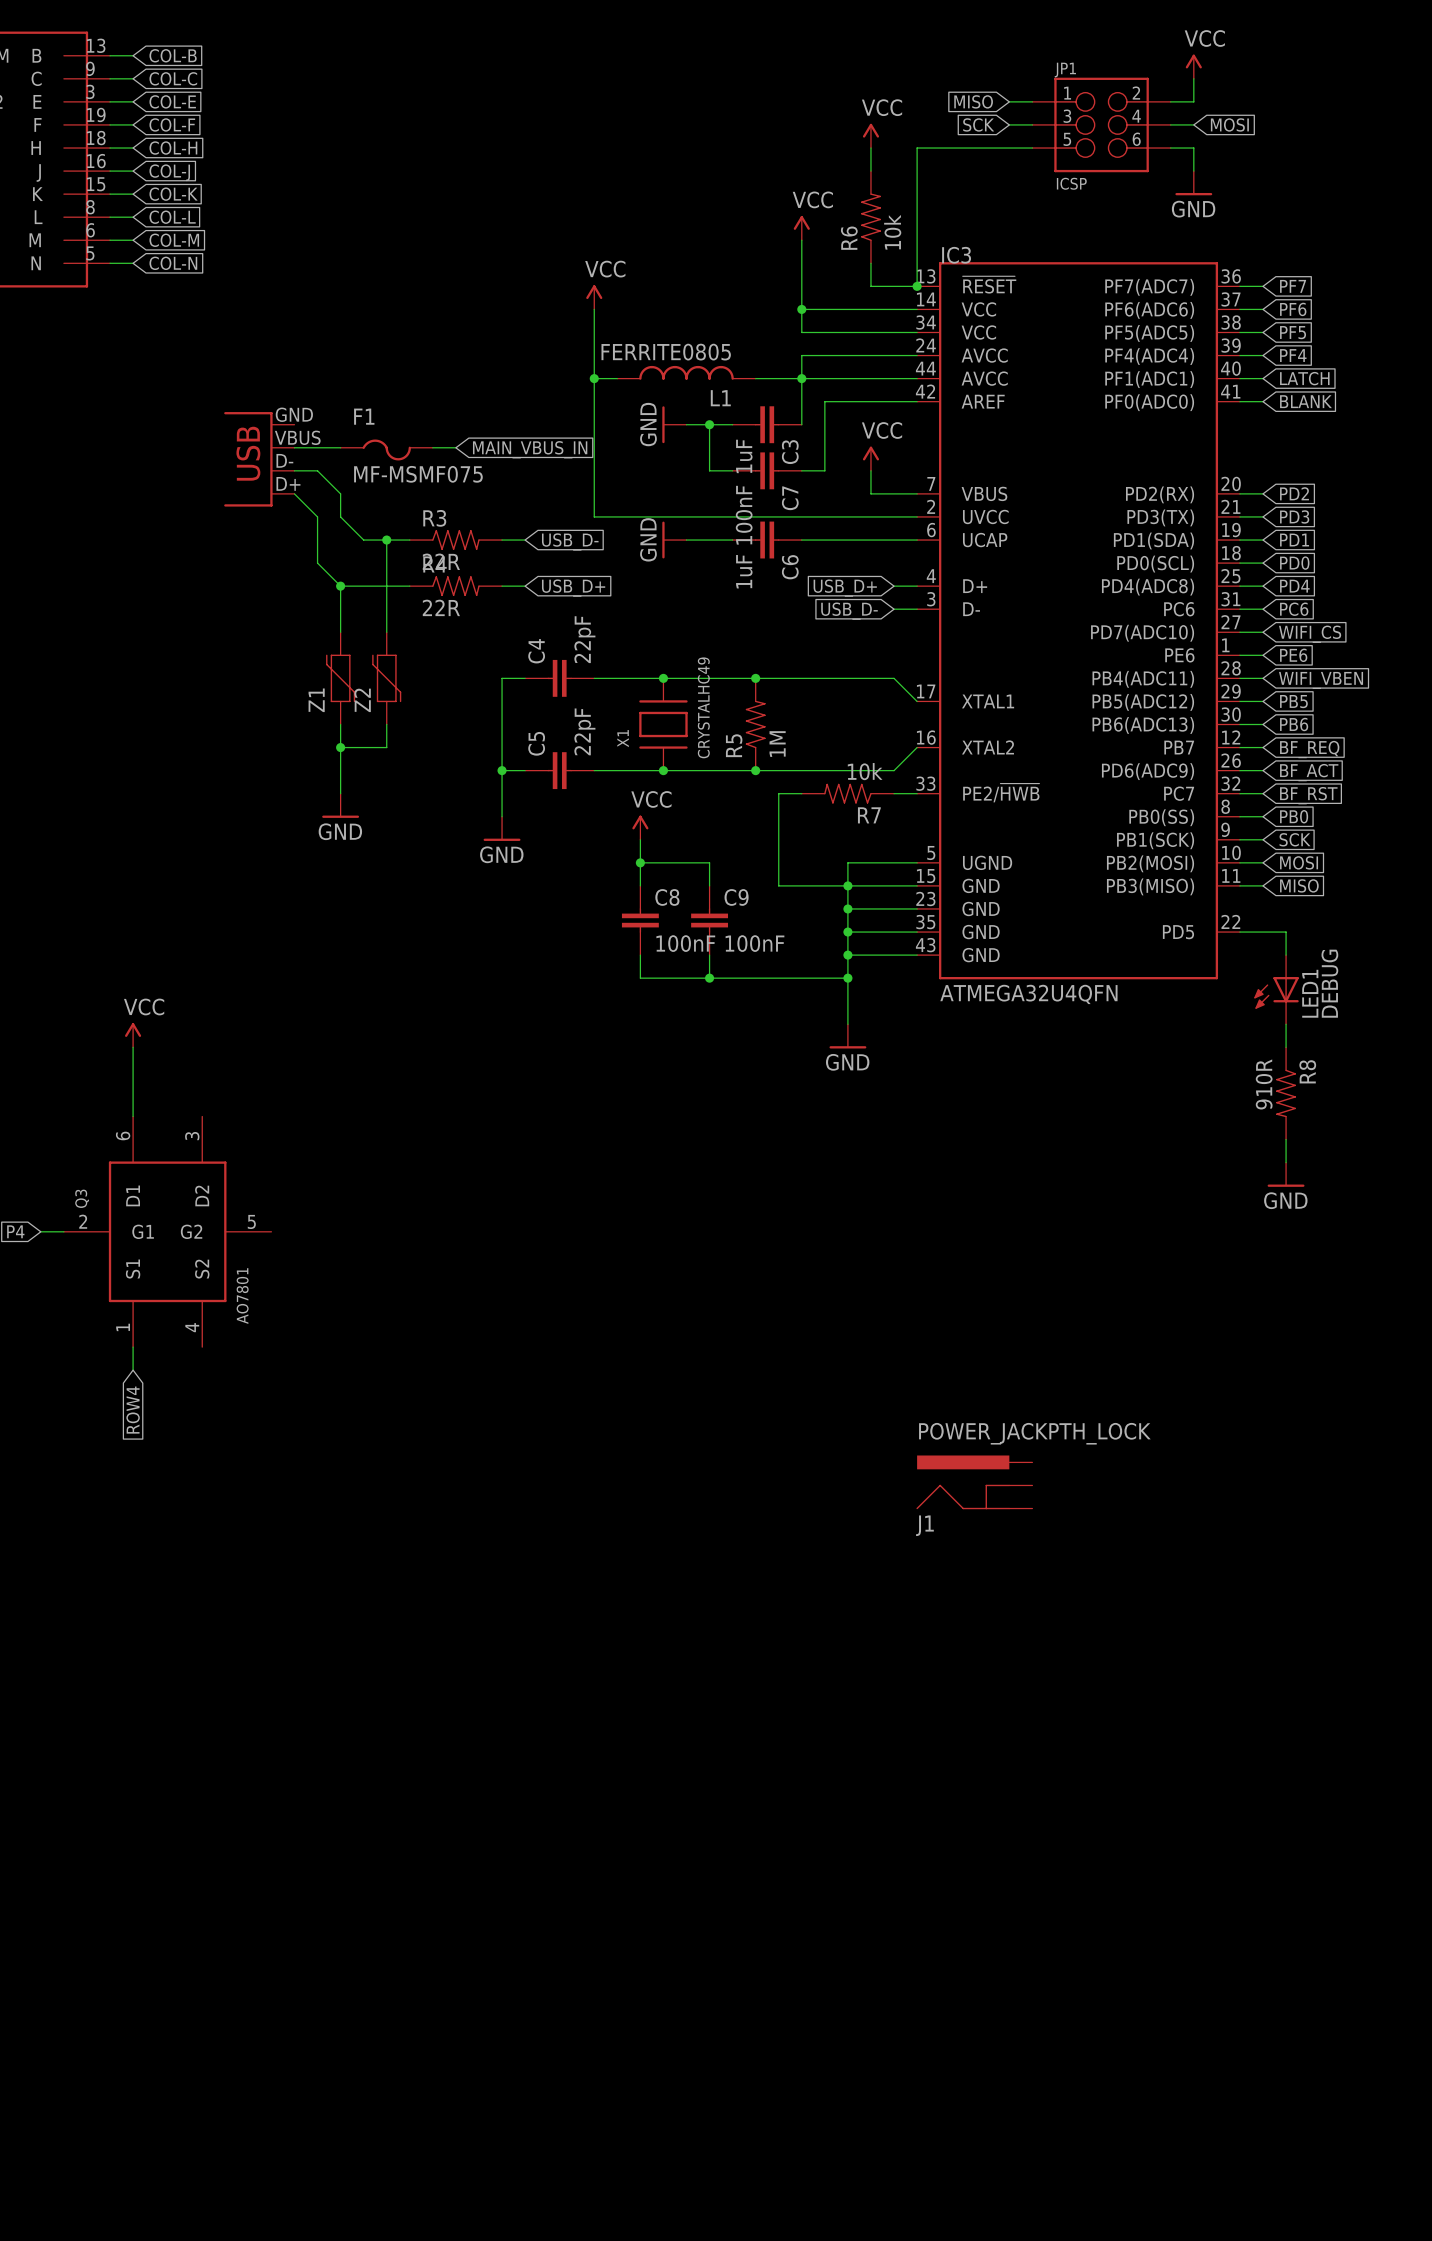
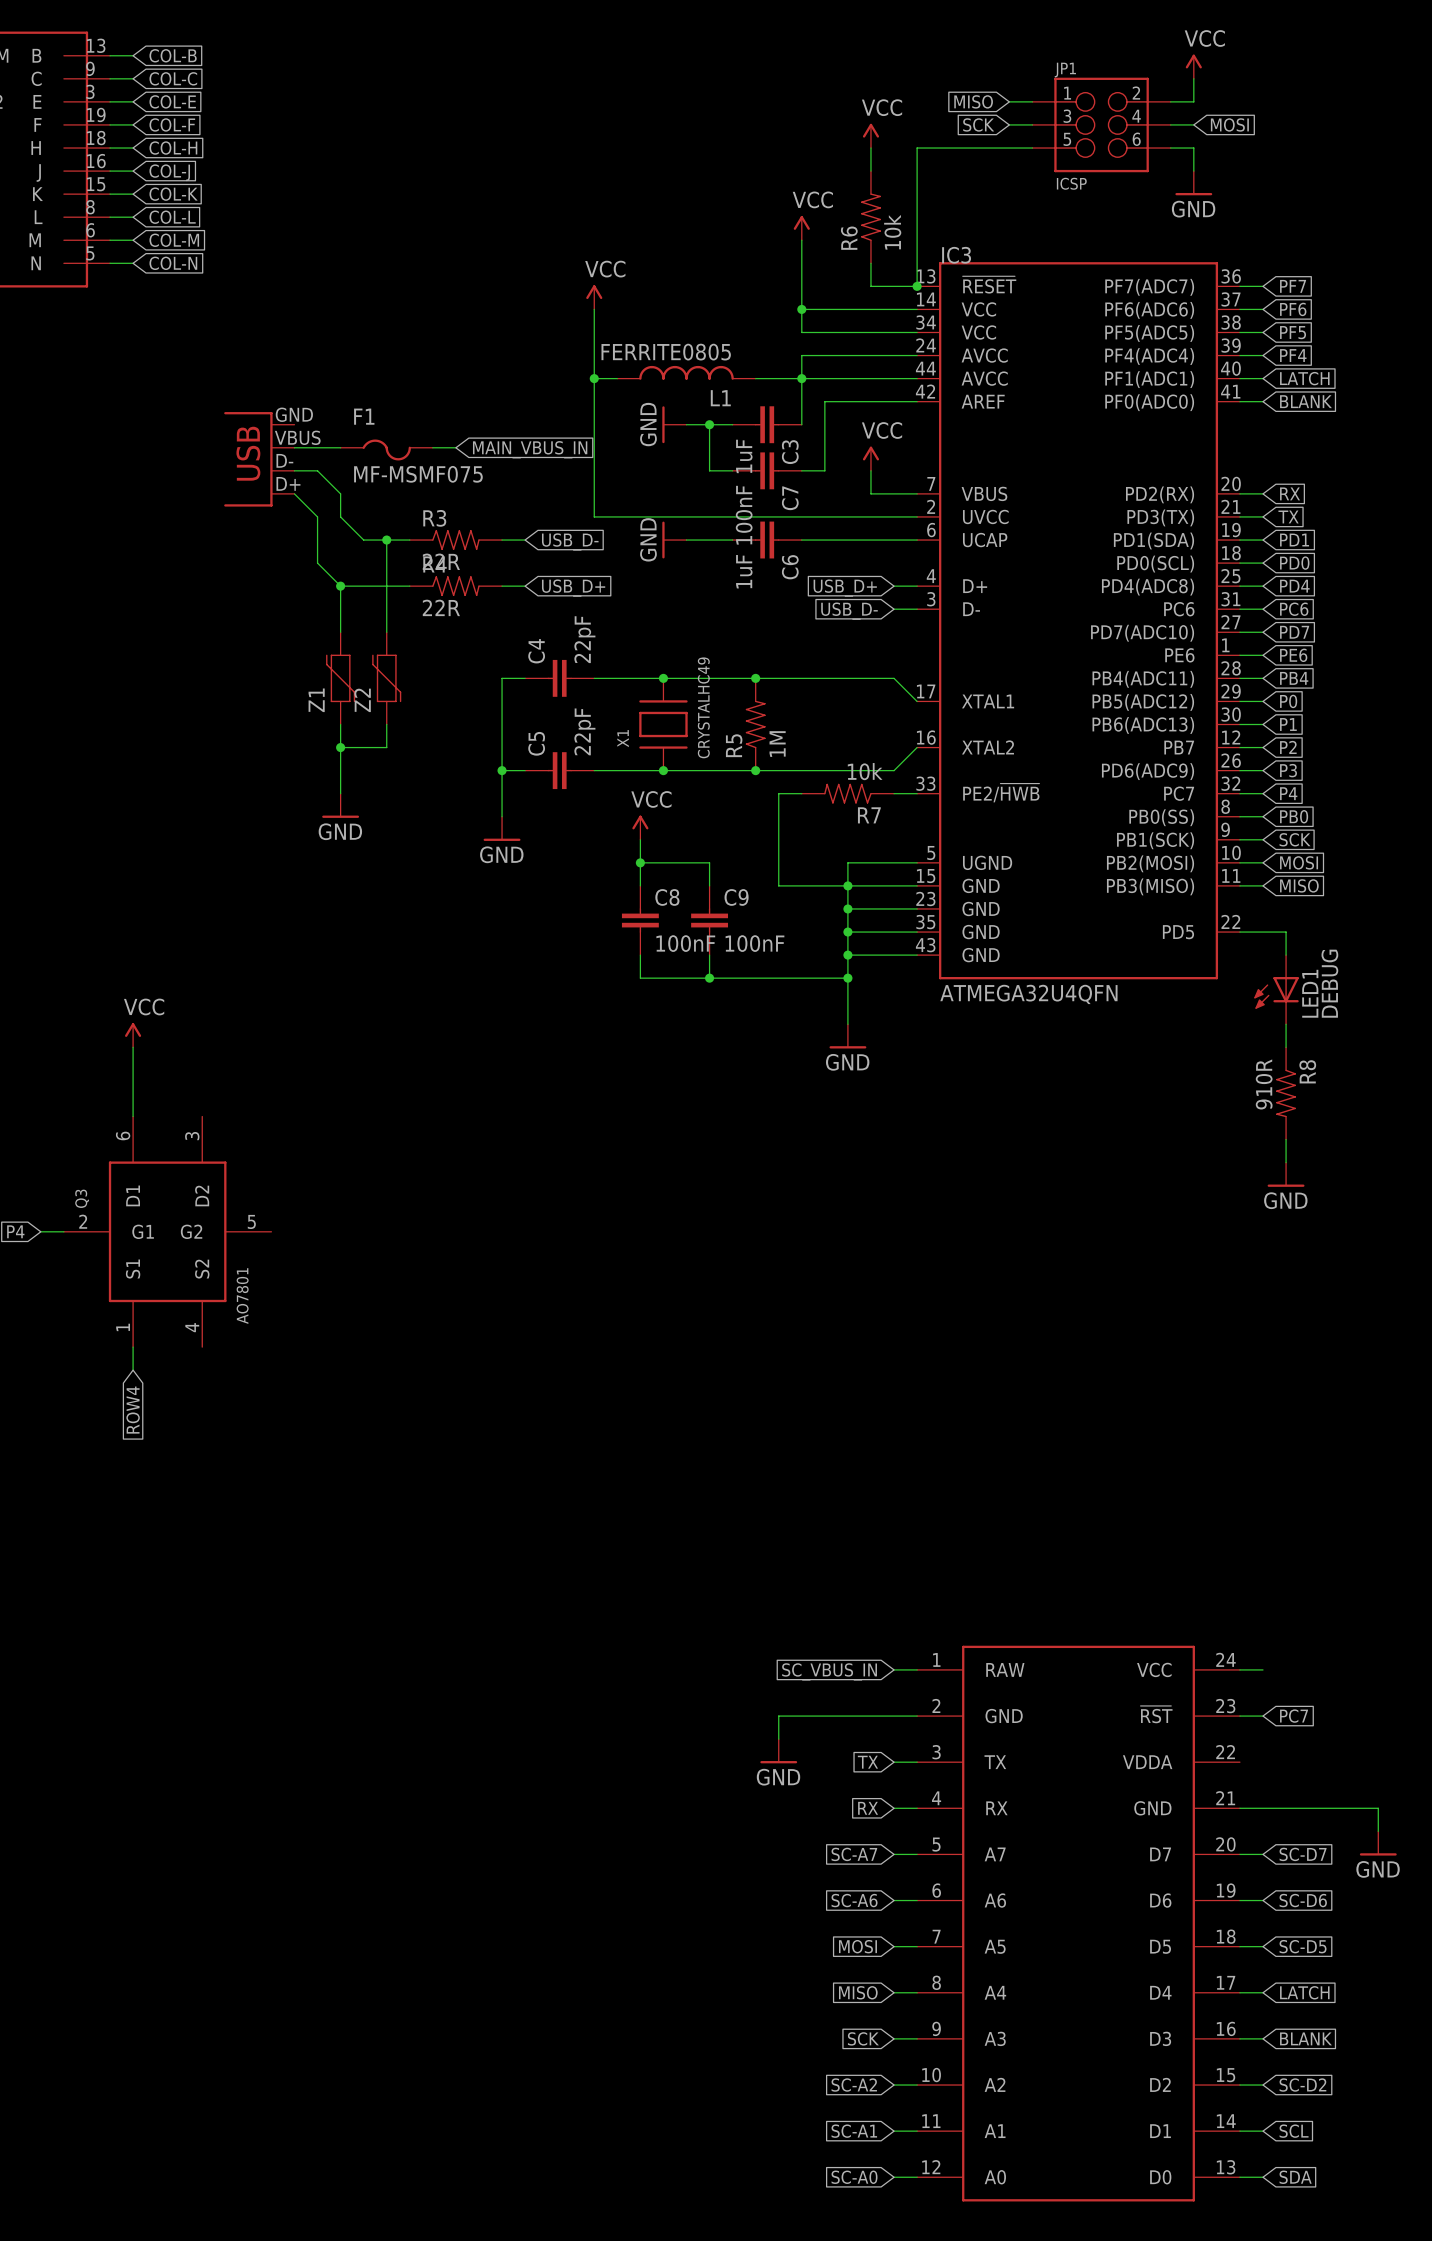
global label: PD2 (1294, 493) -> RX (1290, 493)
global label: PD3 (1294, 516) -> TX (1288, 516)
global label: WIFI_CS (1310, 634) -> PD7 (1294, 632)
global label: WIFI_VBEN (1321, 680) -> PB4 (1294, 678)
global label: PB5 (1293, 701) -> P0 (1288, 701)
global label: PB6 (1294, 724) -> P1 (1288, 724)
global label: BF_REQ (1309, 749) -> P2 (1288, 747)
global label: BF_ACT (1309, 772) -> P3 (1288, 770)
global label: BF_RST (1308, 795) -> P4 (1288, 793)
J1: POWER_JACKPTH_LOCK (974, 1482) -> none
wire: none -> (894, 1669) (917, 1669)
wire: none -> (1239, 1669) (1262, 1669)
global label: none -> SC_VBUS_IN (829, 1671)
wire: none -> (917, 1716) (778, 1716) (778, 1739)
wire: none -> (1239, 1716) (1262, 1716)
global label: none -> PC7 (1294, 1716)
power symbol: none -> GND (778, 1751)
global label: none -> TX (867, 1762)
wire: none -> (894, 1762) (917, 1762)
global label: none -> RX (868, 1808)
wire: none -> (894, 1808) (917, 1808)
wire: none -> (1239, 1808) (1378, 1808) (1378, 1831)
power symbol: none -> GND (1378, 1843)
global label: none -> SC-A7 (854, 1854)
wire: none -> (894, 1854) (917, 1854)
wire: none -> (1239, 1854) (1262, 1854)
global label: none -> SC-D7 (1303, 1854)
global label: none -> SC-A6 (854, 1900)
wire: none -> (894, 1900) (917, 1900)
wire: none -> (1239, 1900) (1262, 1900)
global label: none -> SC-D6 (1303, 1900)
part: none -> (1078, 1923)
global label: none -> MOSI (857, 1946)
wire: none -> (894, 1946) (917, 1946)
wire: none -> (1239, 1946) (1262, 1946)
global label: none -> SC-D5 (1303, 1946)
global label: none -> MISO (858, 1992)
wire: none -> (894, 1992) (917, 1992)
wire: none -> (1239, 1992) (1262, 1992)
global label: none -> LATCH (1304, 1992)
global label: none -> SCK (863, 2038)
wire: none -> (894, 2038) (917, 2038)
wire: none -> (1239, 2038) (1262, 2038)
global label: none -> BLANK (1305, 2038)
global label: none -> SC-A2 (854, 2085)
wire: none -> (894, 2085) (917, 2085)
wire: none -> (1239, 2085) (1262, 2085)
global label: none -> SC-D2 (1302, 2085)
global label: none -> SC-A1 (854, 2131)
wire: none -> (894, 2131) (917, 2131)
wire: none -> (1239, 2131) (1262, 2131)
global label: none -> SCL (1294, 2131)
global label: none -> SC-A0 (854, 2177)
wire: none -> (894, 2177) (917, 2177)
wire: none -> (1239, 2177) (1262, 2177)
global label: none -> SDA (1295, 2177)

